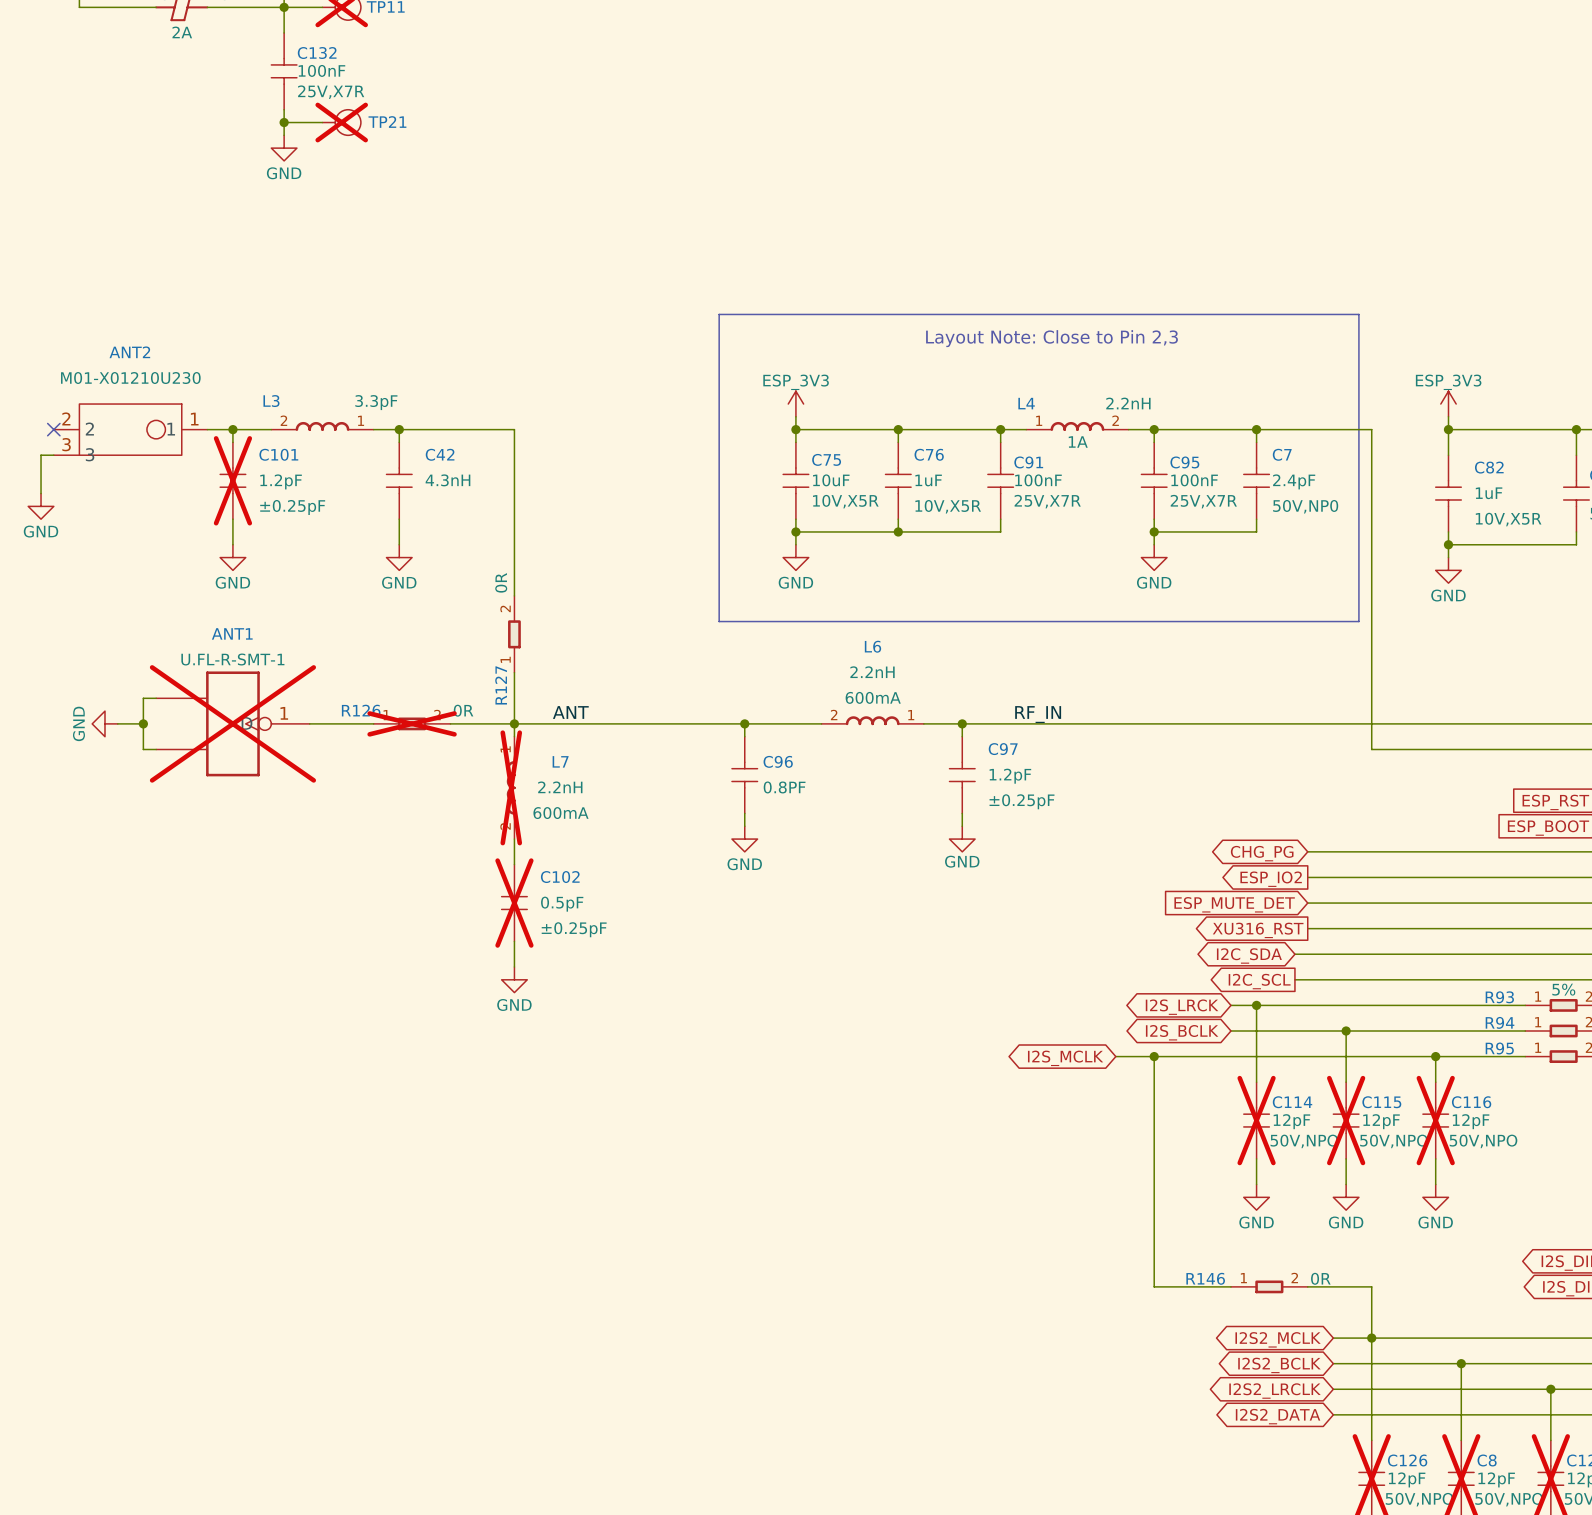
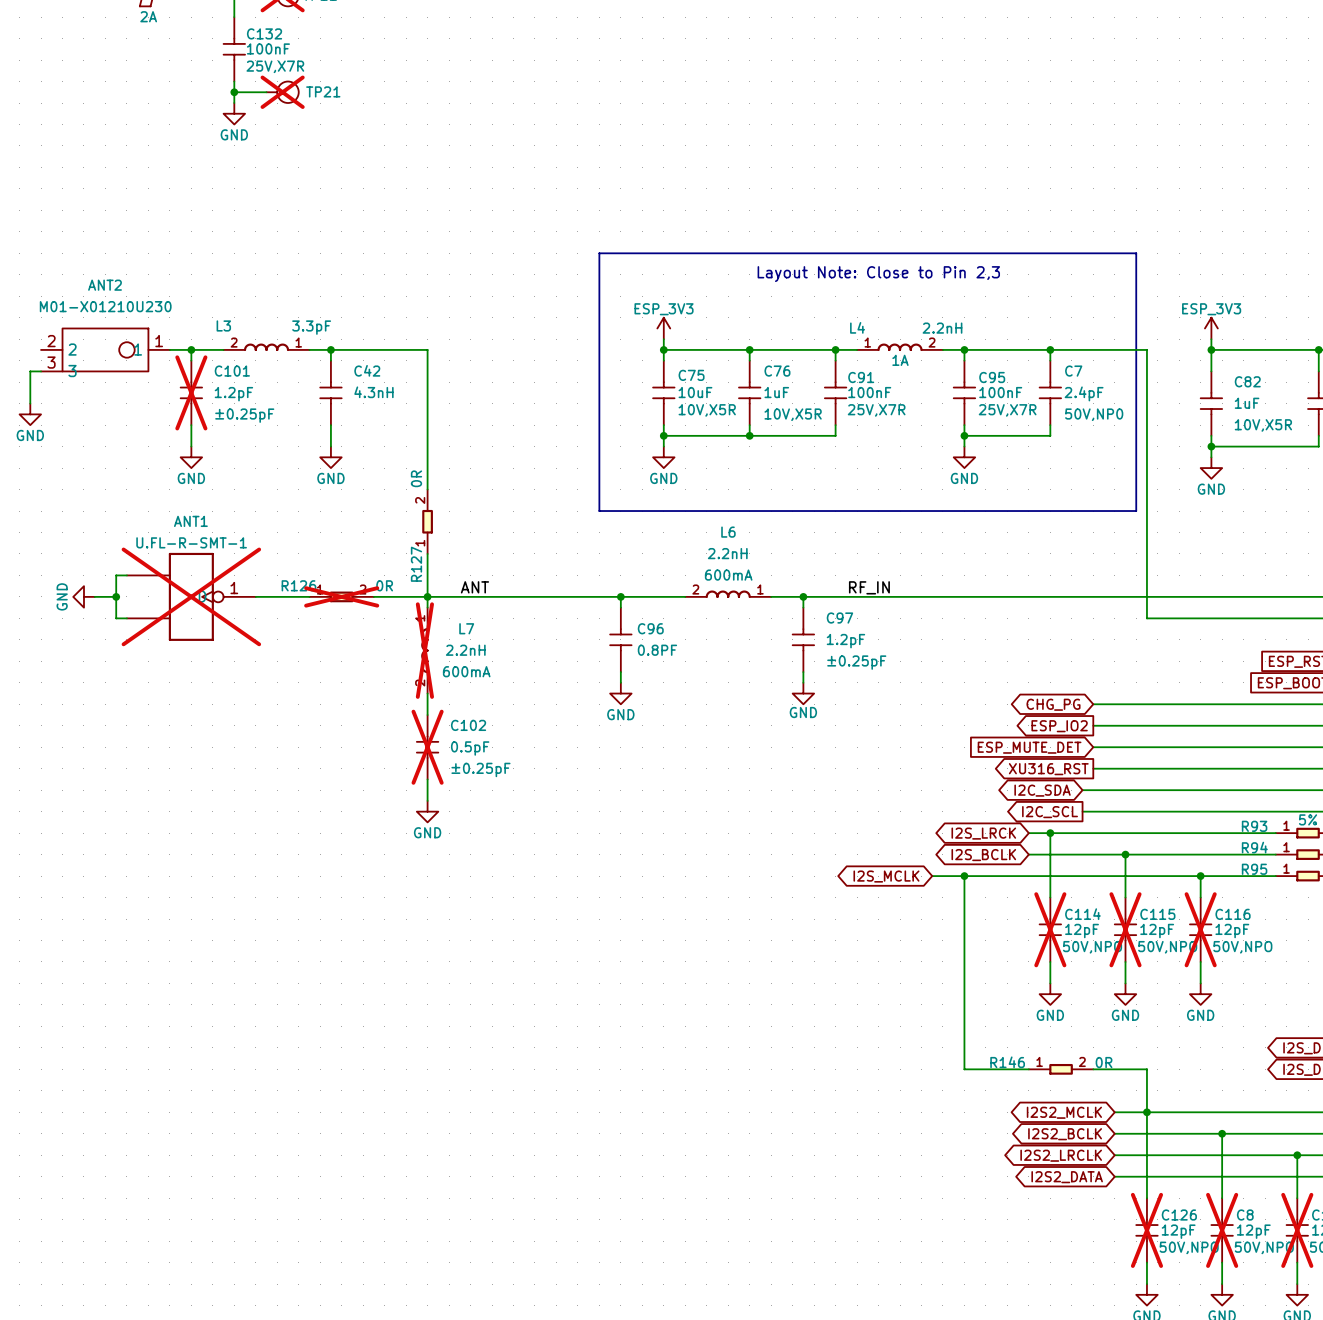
no-connect mark: (53, 429) -> none

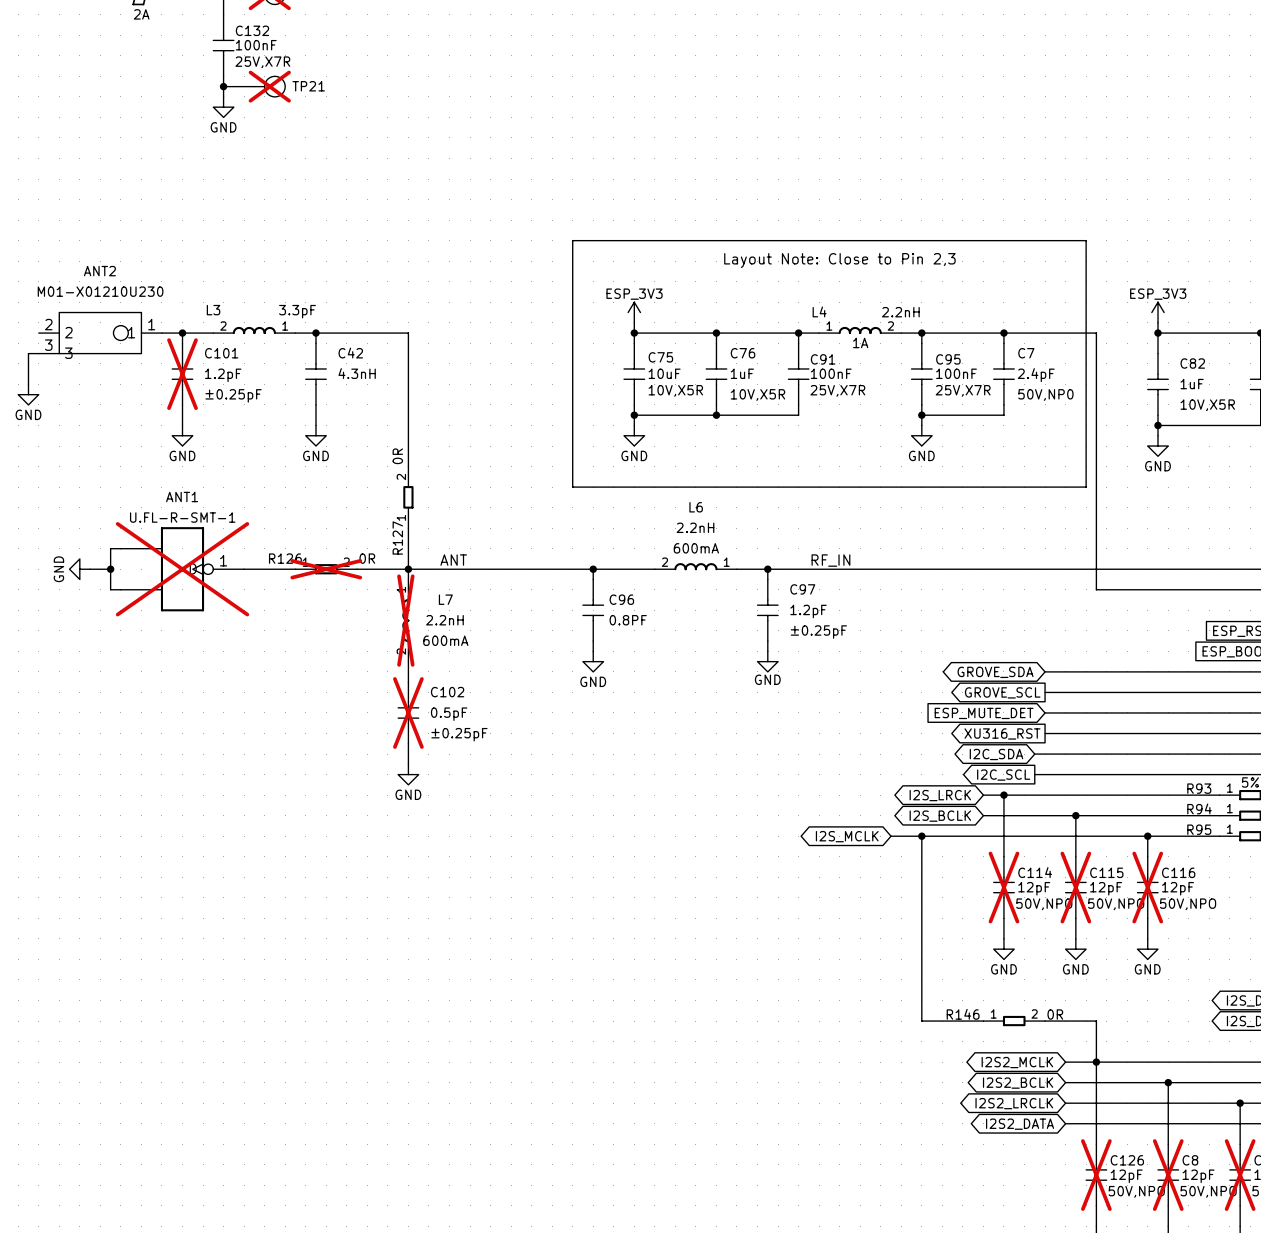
global label: CHG_PG (1053, 704) -> GROVE_SDA (995, 672)
global label: ESP_IO2 (1059, 726) -> GROVE_SCL (1002, 692)

